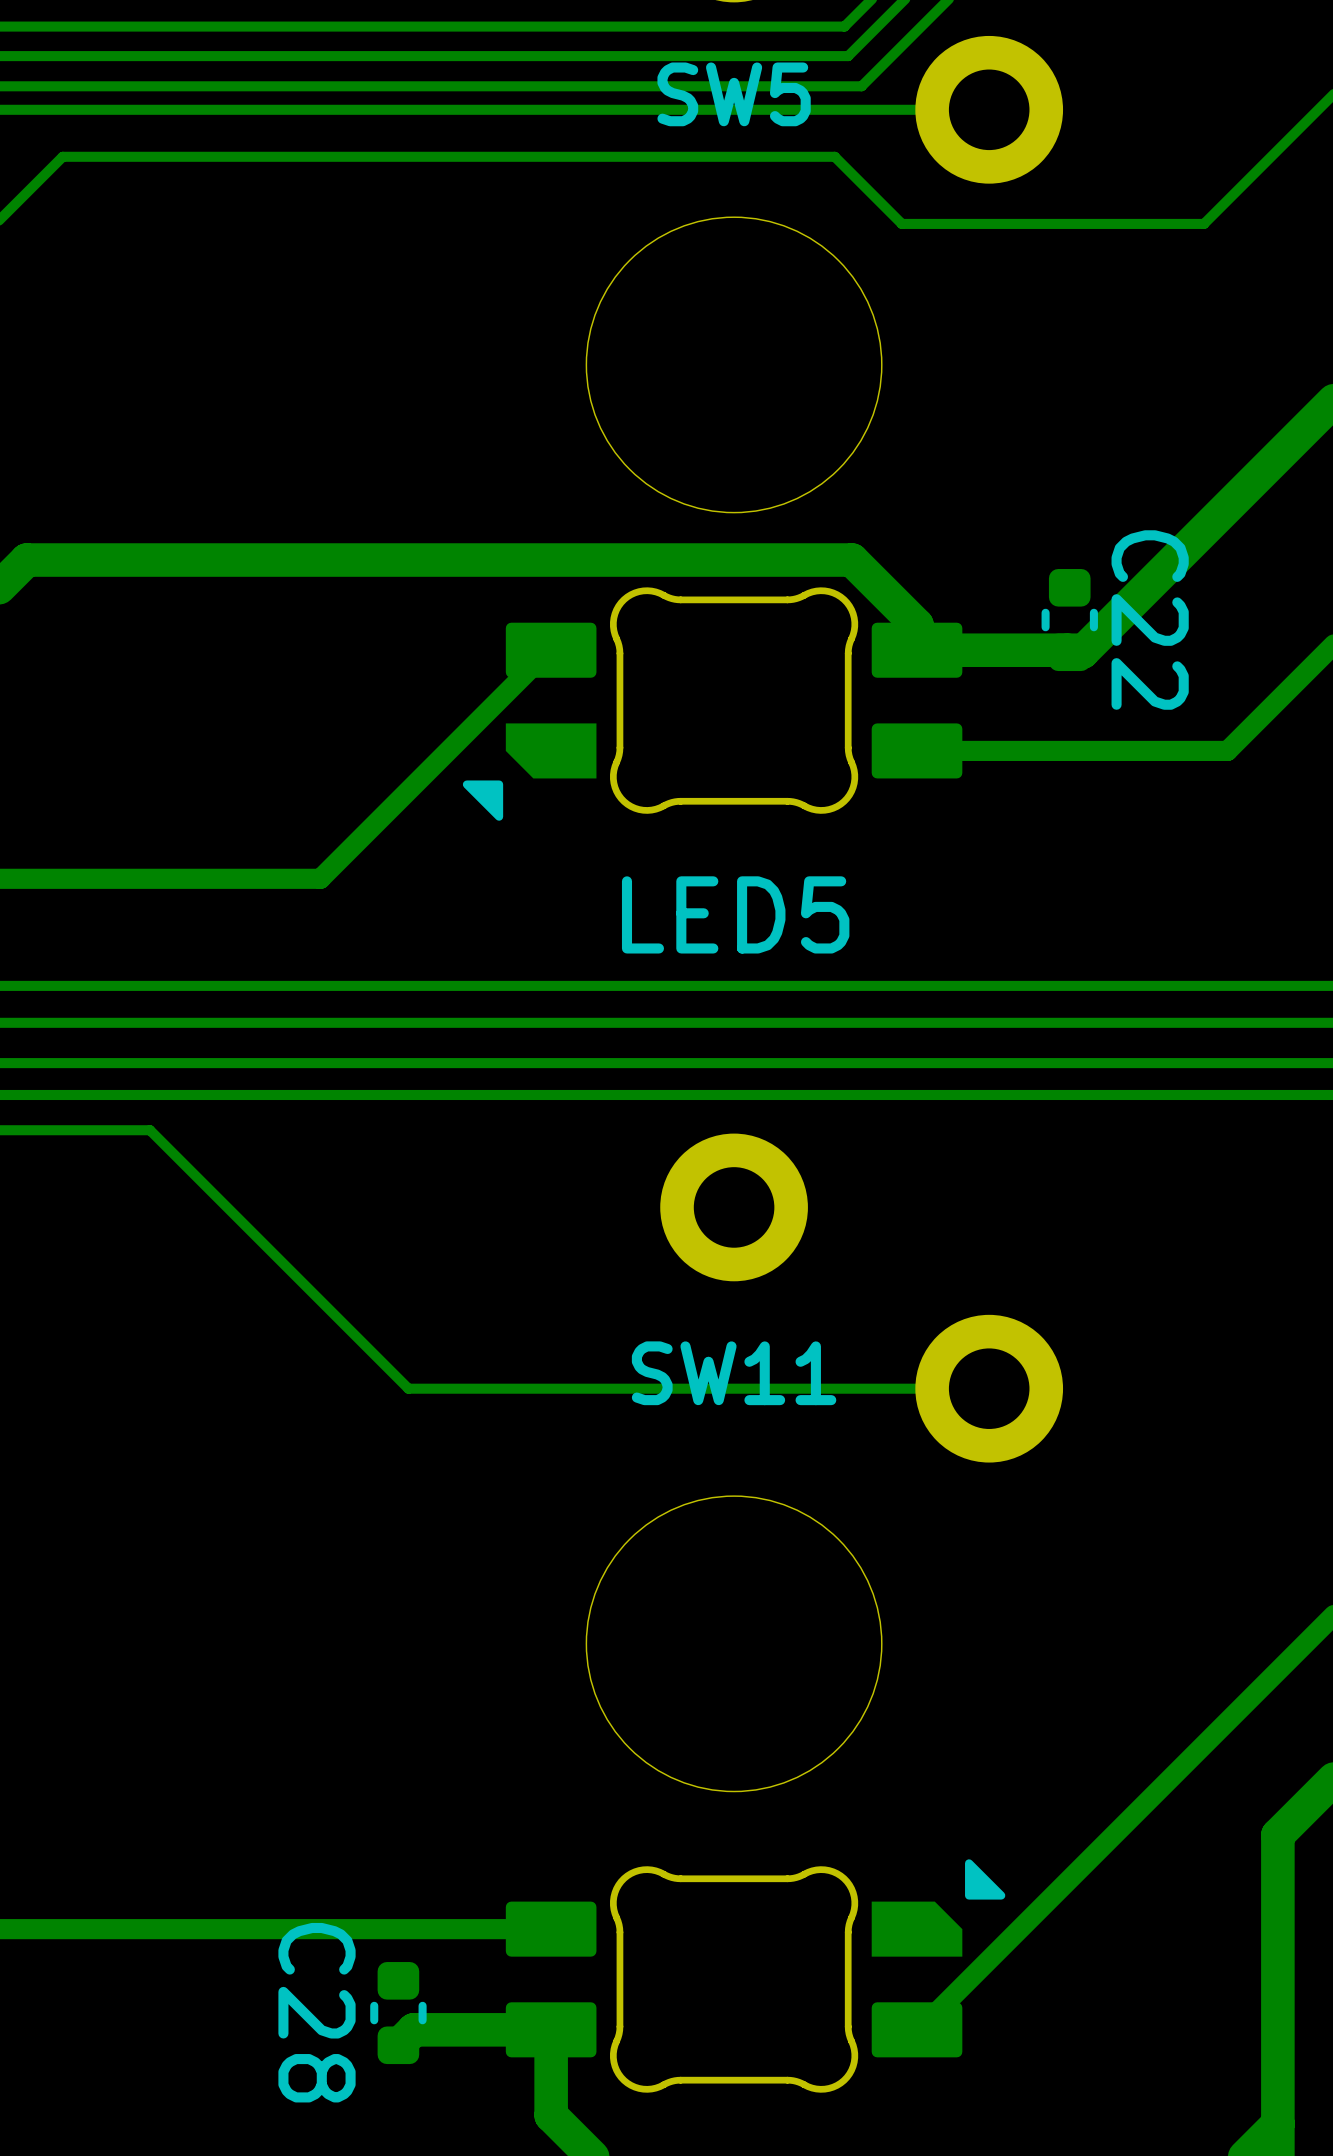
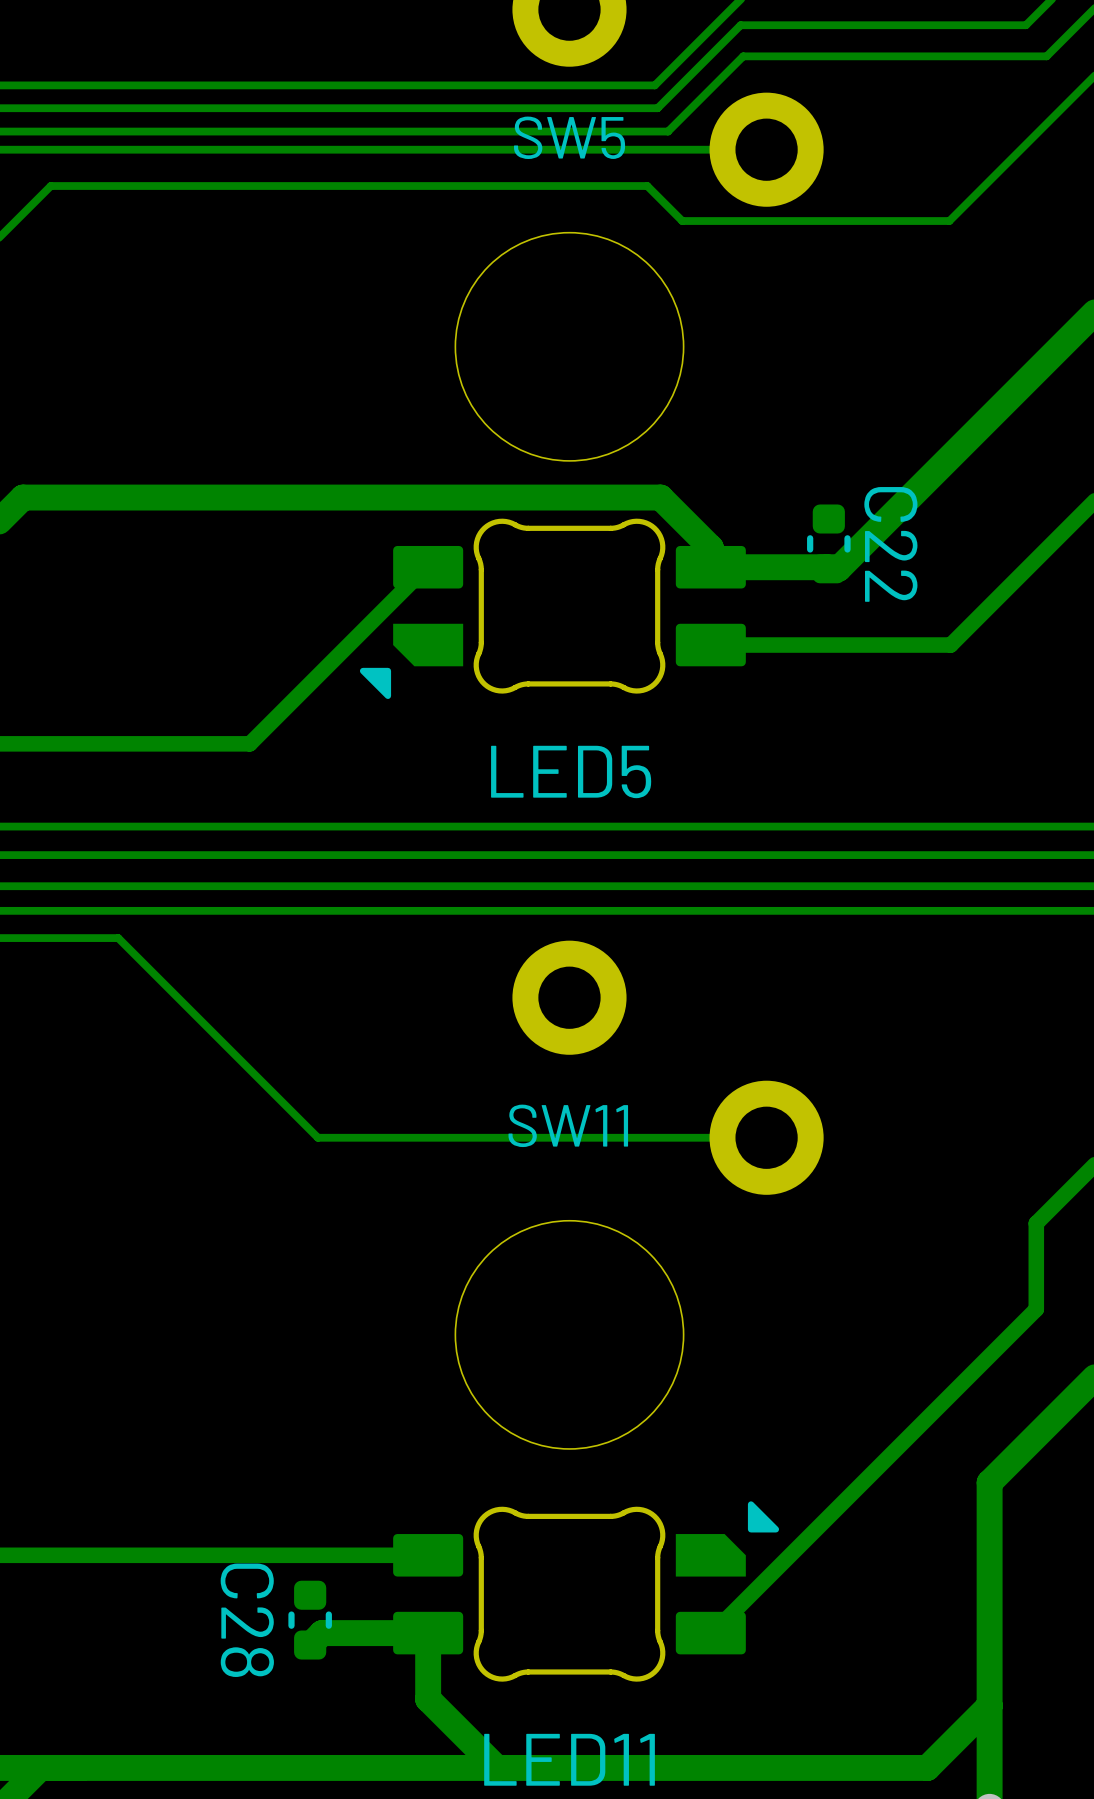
bottom track: (1225, 202) (1204, 223) (901, 223) (880, 202) -> (949, 221) (682, 221)

